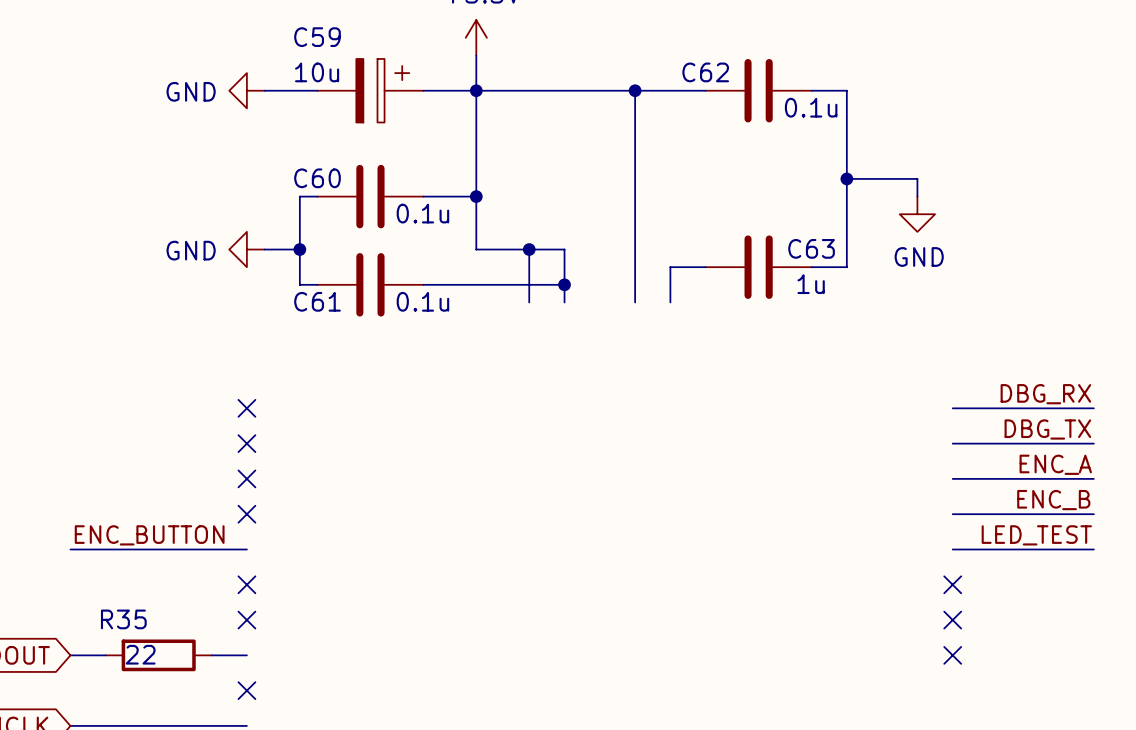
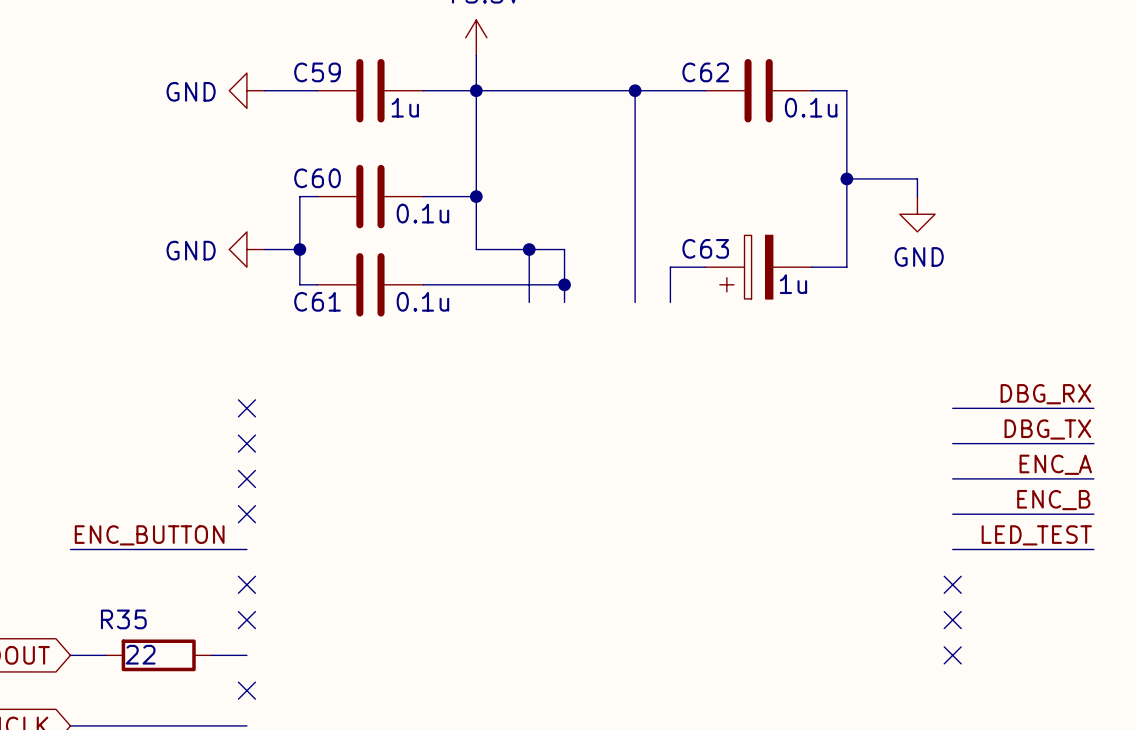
C59 name position: C59 (317, 37) -> C59 (317, 72)
C59 symbol: [317, 58, 424, 123] -> [317, 58, 424, 123]
C59 value: 10u (317, 72) -> 1u (405, 107)
C63 symbol: [705, 235, 812, 299] -> [705, 235, 812, 299]
C63 name position: C63 (811, 248) -> C63 (705, 248)

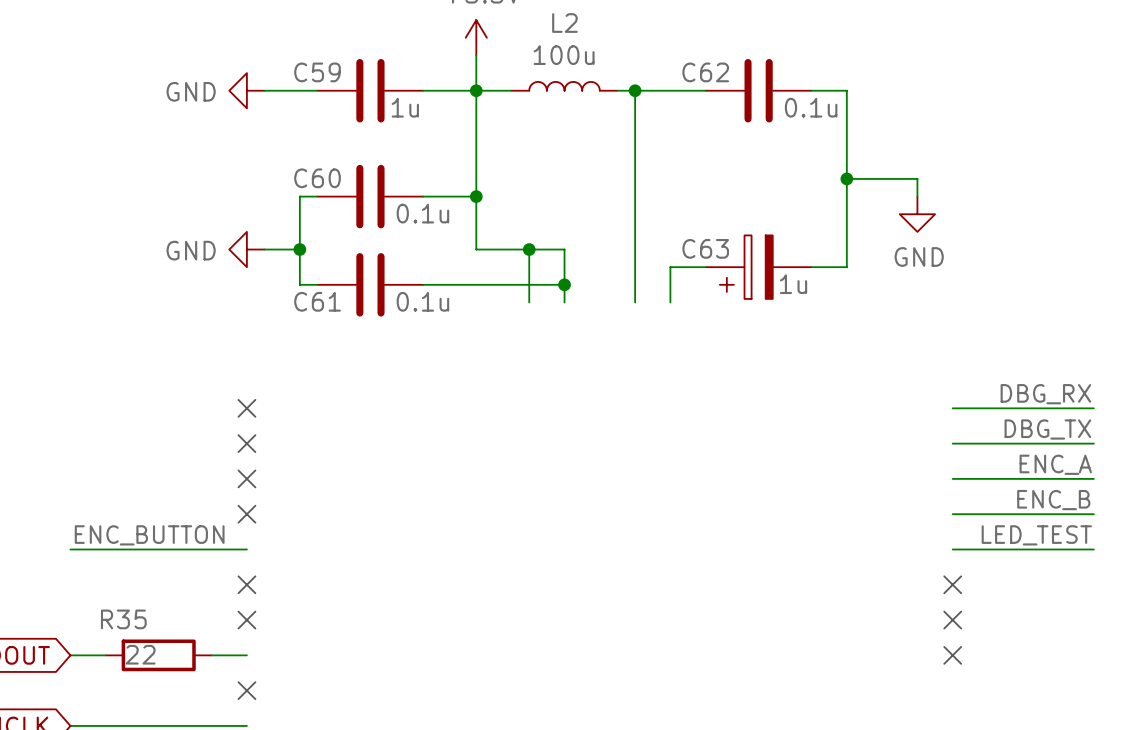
L2: none -> 100u (564, 86)
wire: (511, 90) (617, 90) -> none

